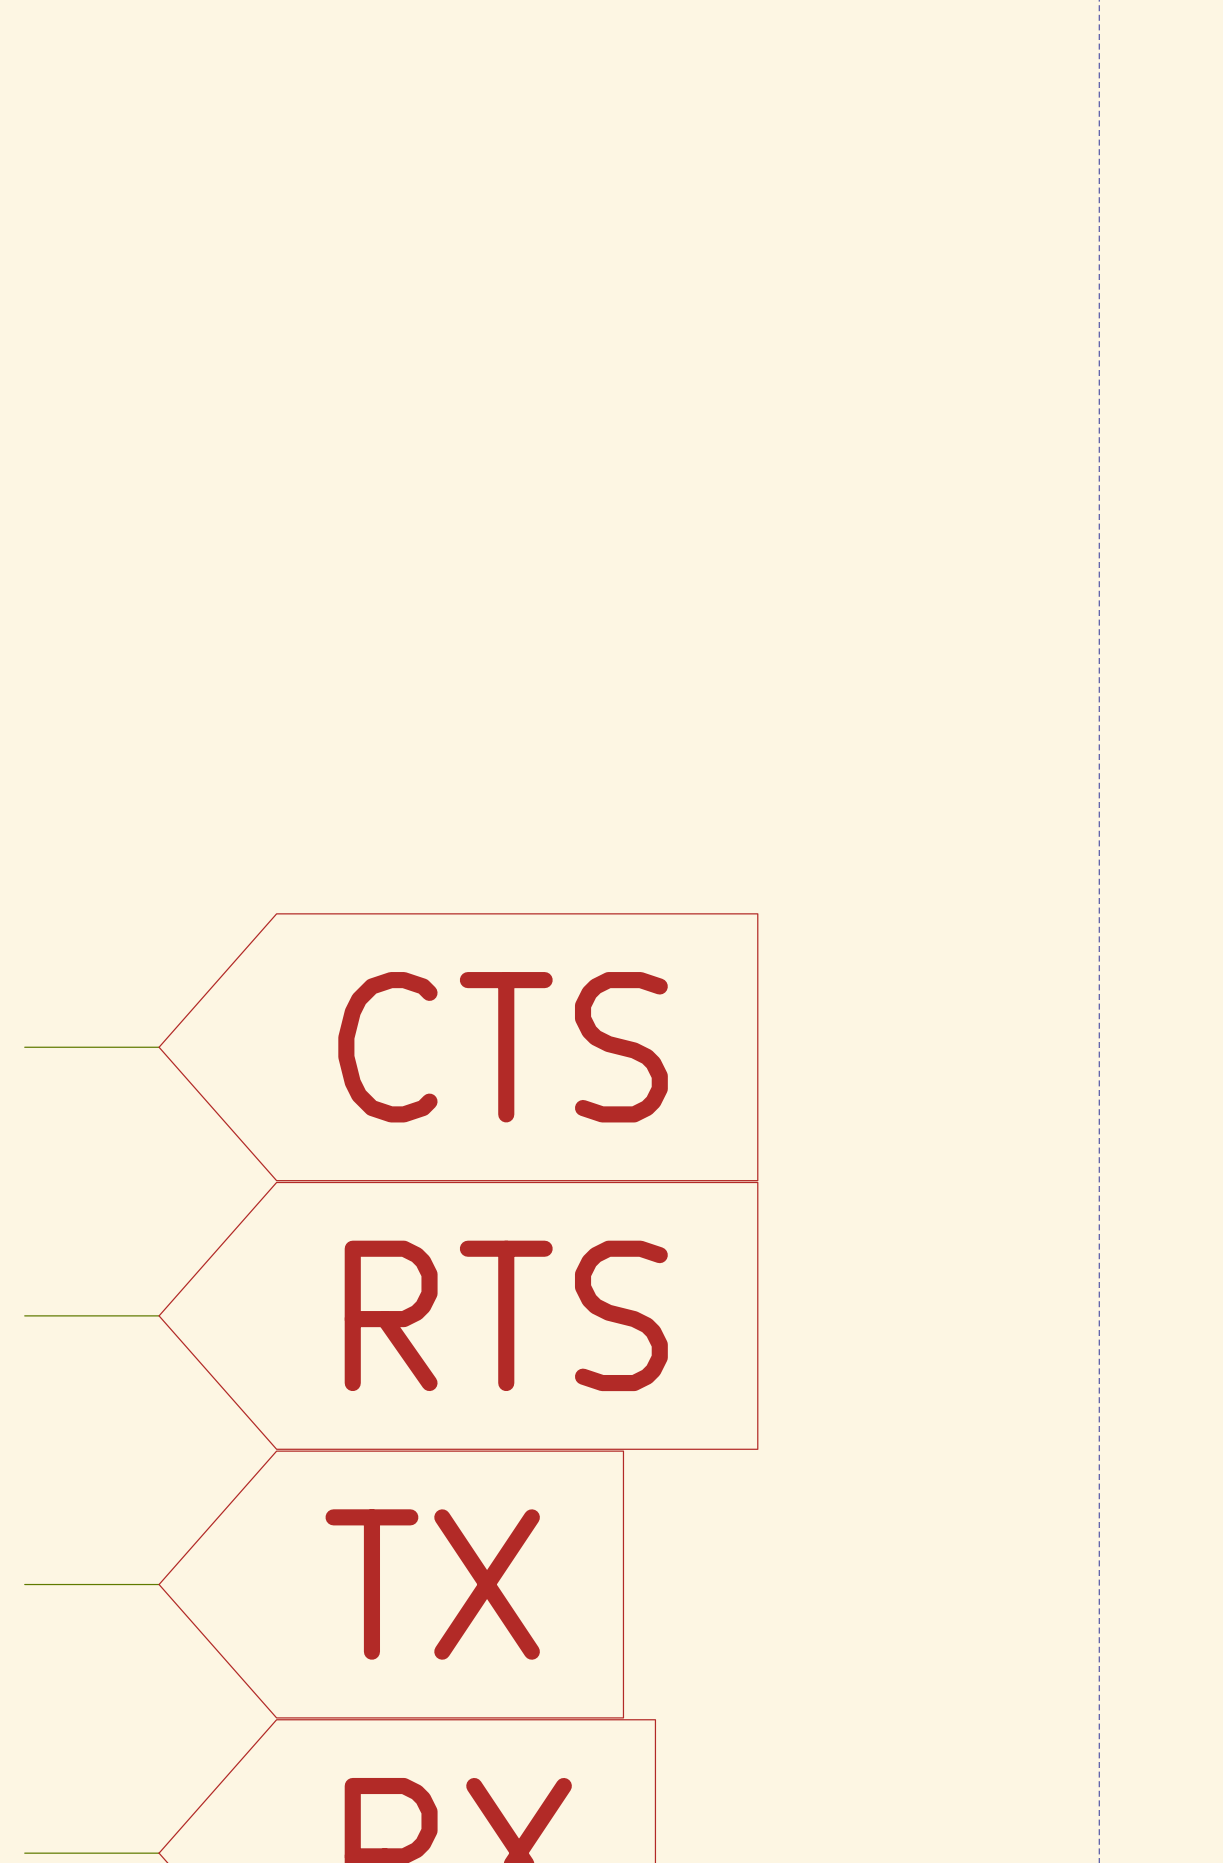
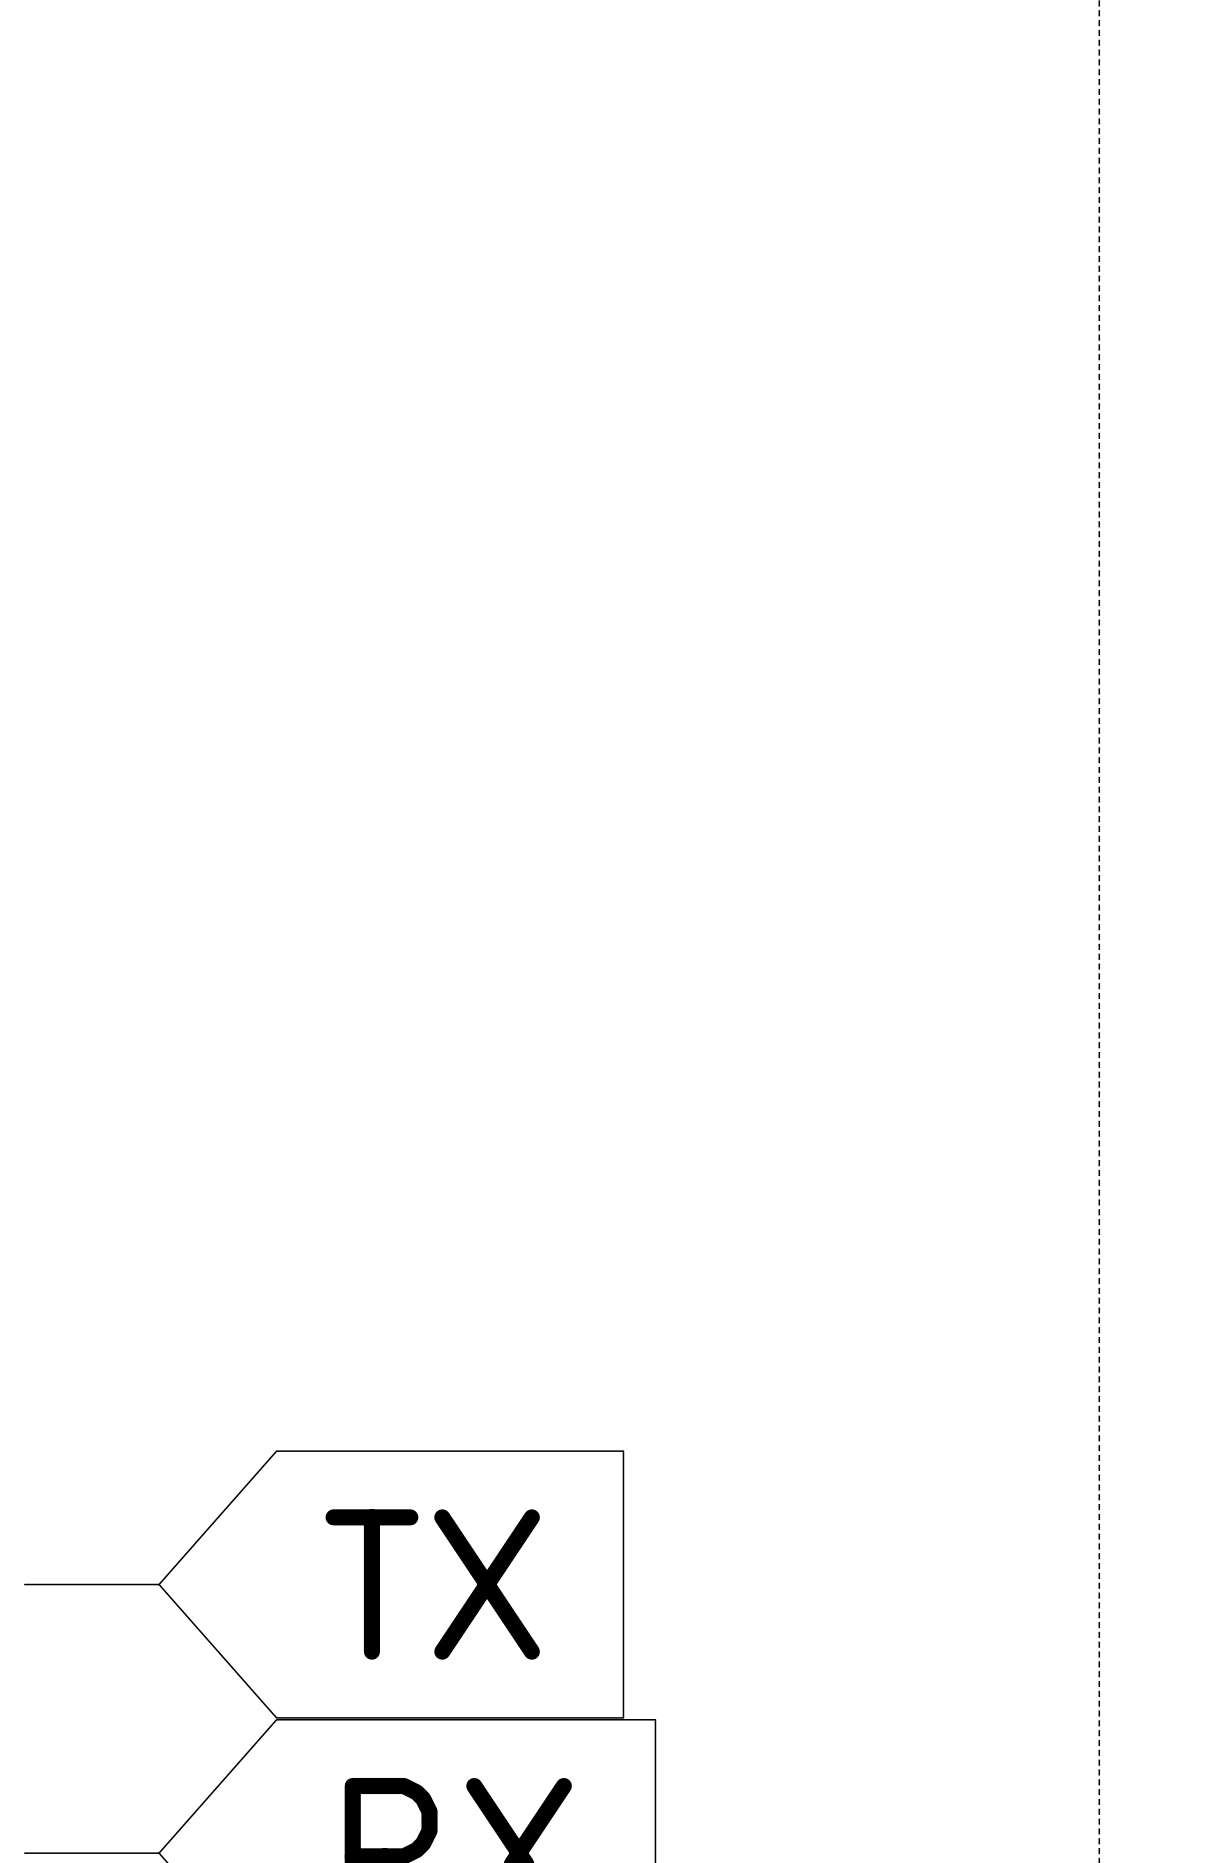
wire: (24, 1047) (159, 1047) -> none
global label: CTS (503, 1047) -> none
wire: (24, 1315) (159, 1315) -> none
global label: RTS (506, 1315) -> none

